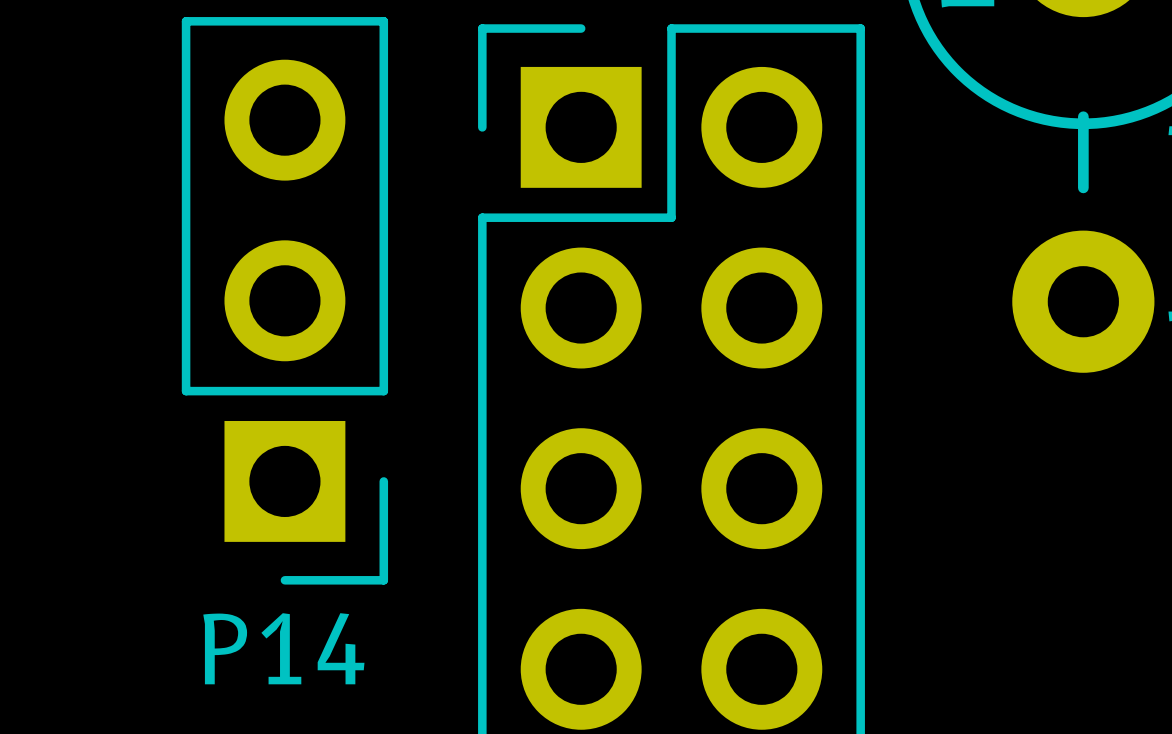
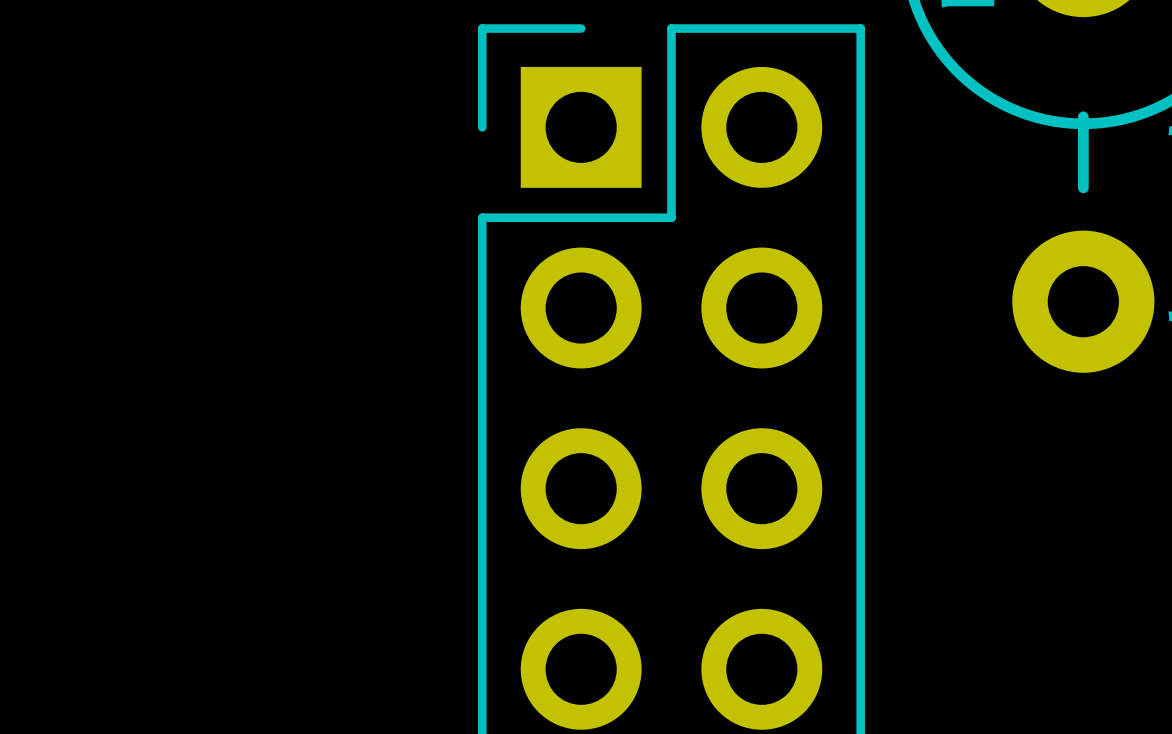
P14: (284, 300) -> none

